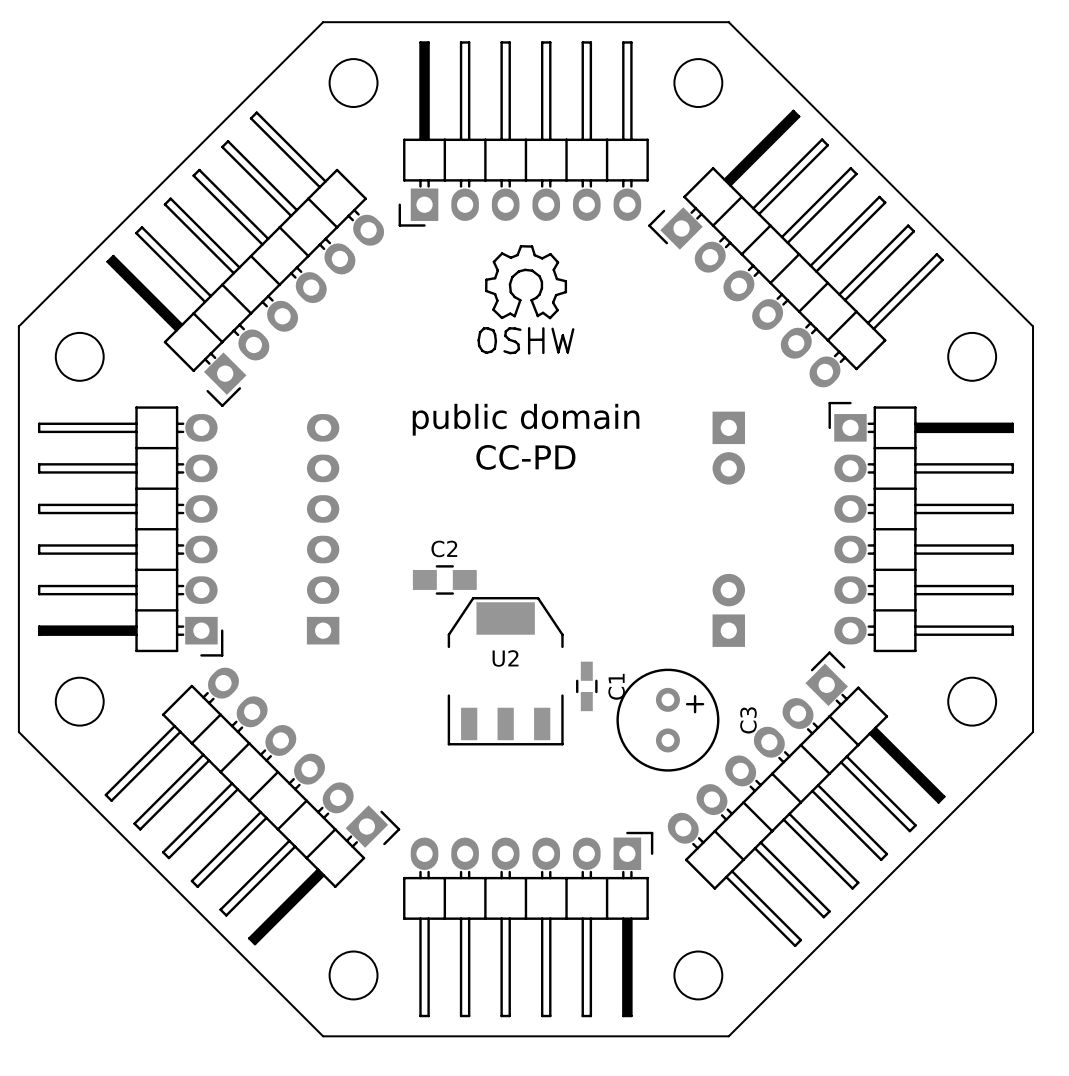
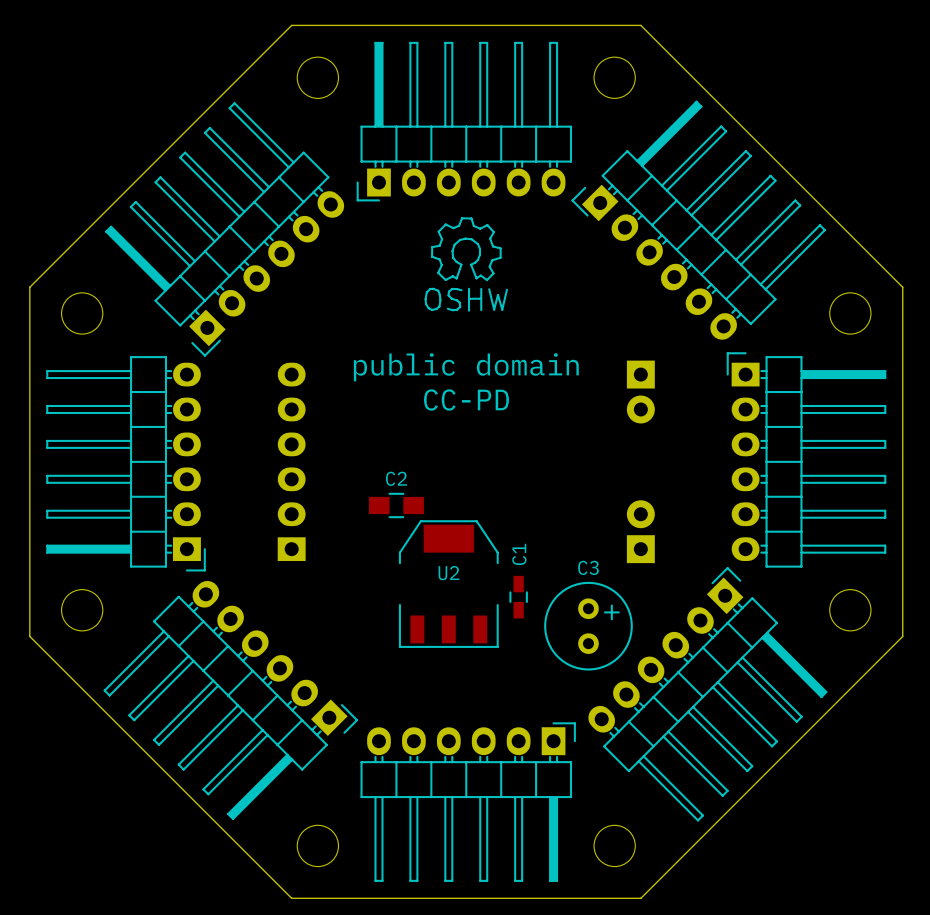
C1 name position: C1 (616, 686) -> C1 (519, 554)
C3 name rotation: 0° (748, 720) -> 90° clockwise (588, 567)
C3 name position: C3 (748, 720) -> C3 (588, 567)

